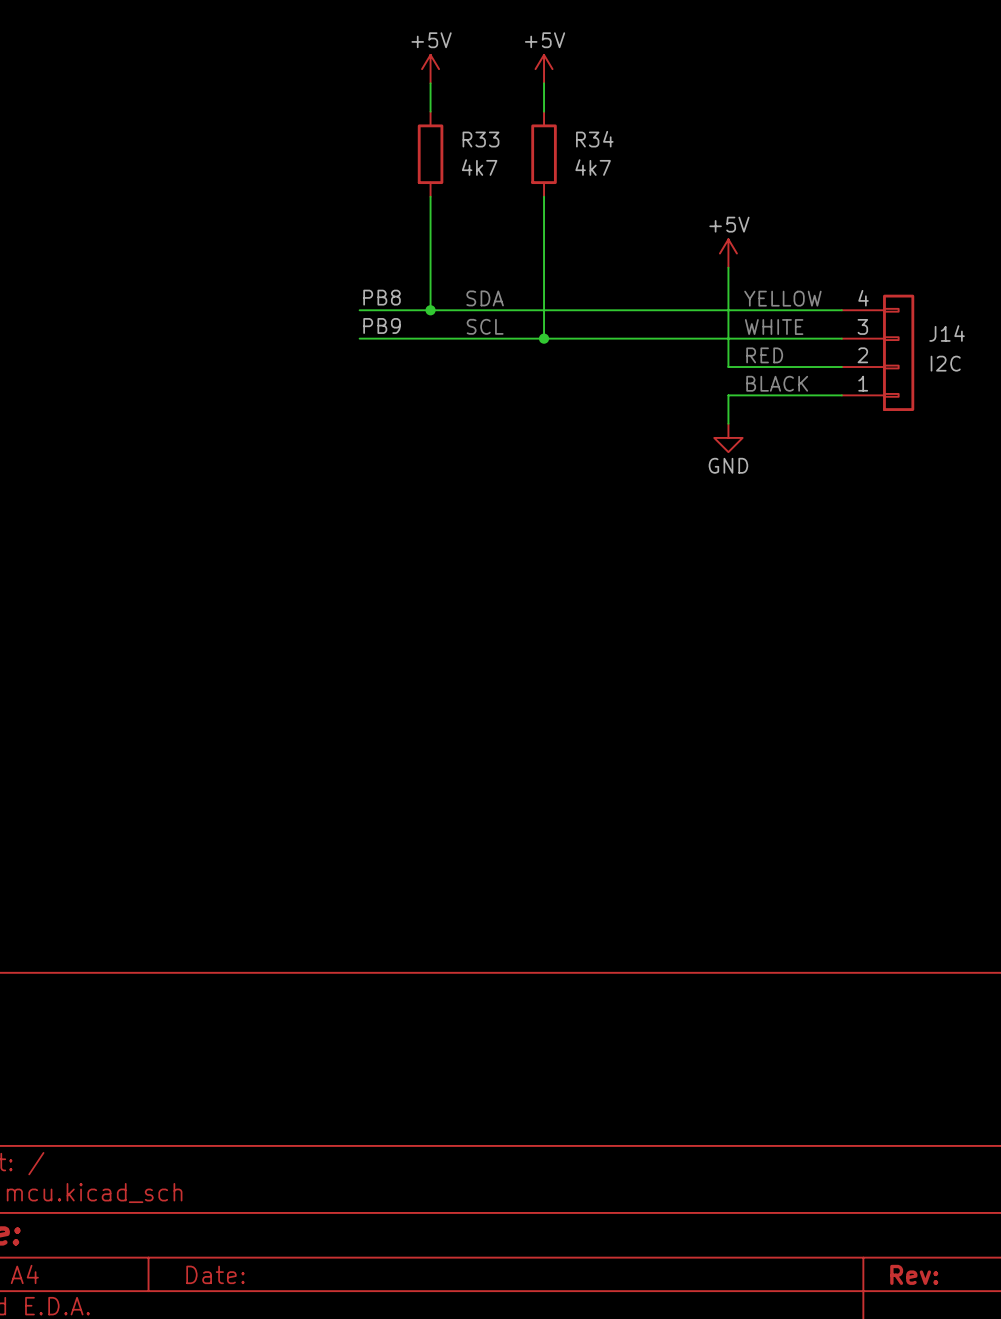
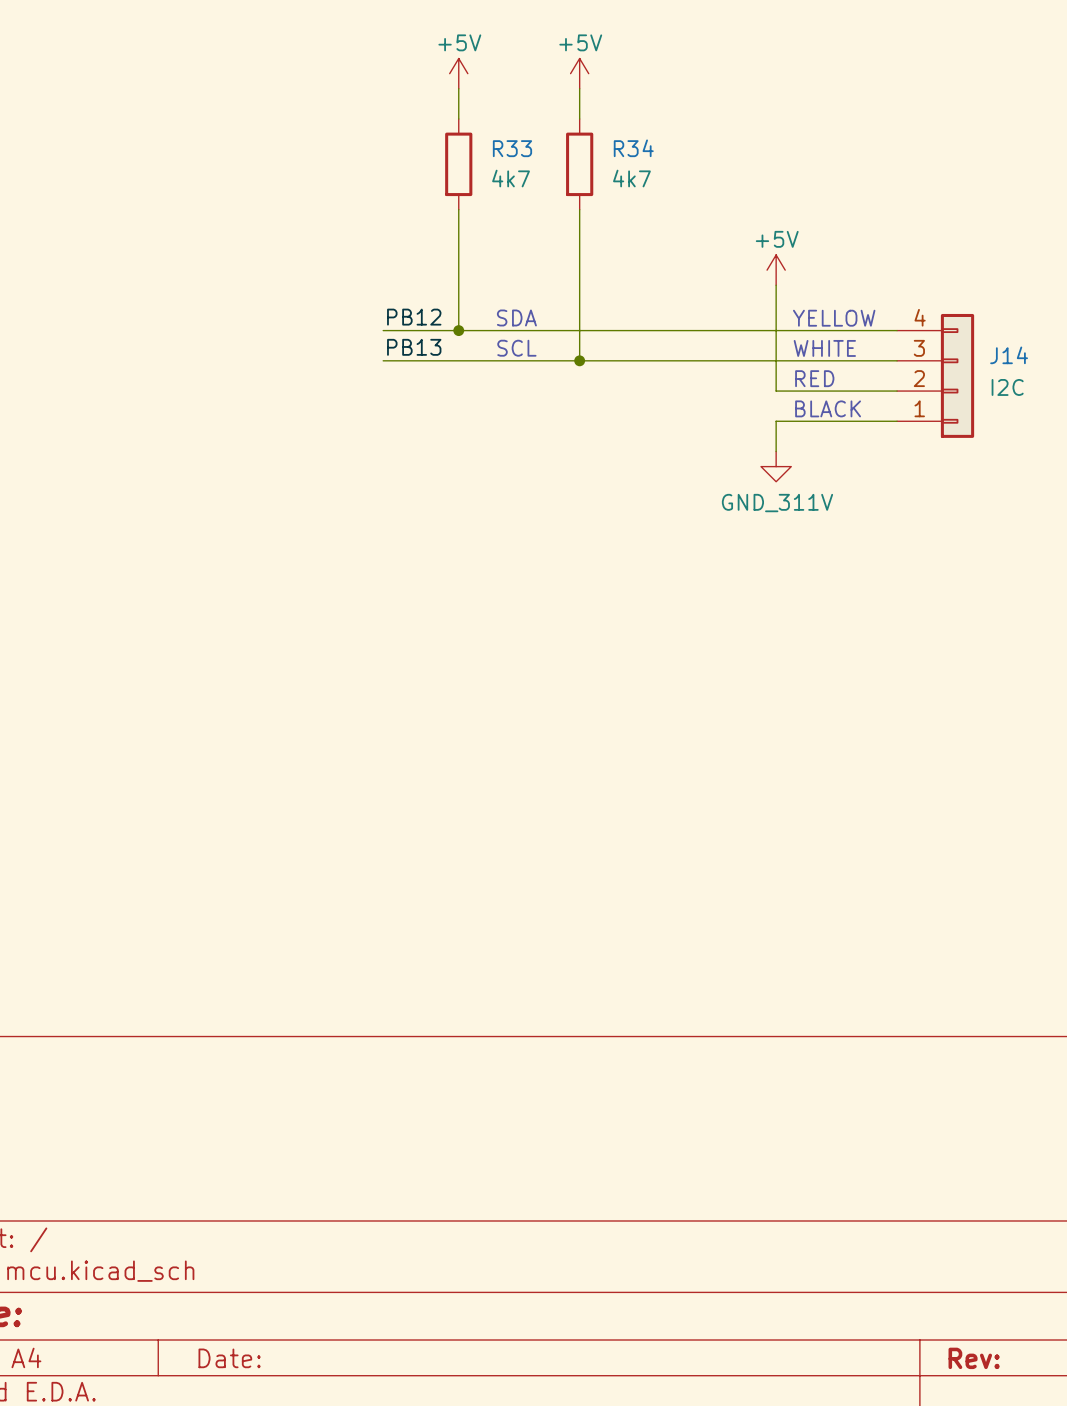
label: PB8 (382, 297) -> PB12 (414, 317)
label: PB9 (382, 325) -> PB13 (414, 347)
power symbol: GND (728, 437) -> GND_311V (776, 466)

